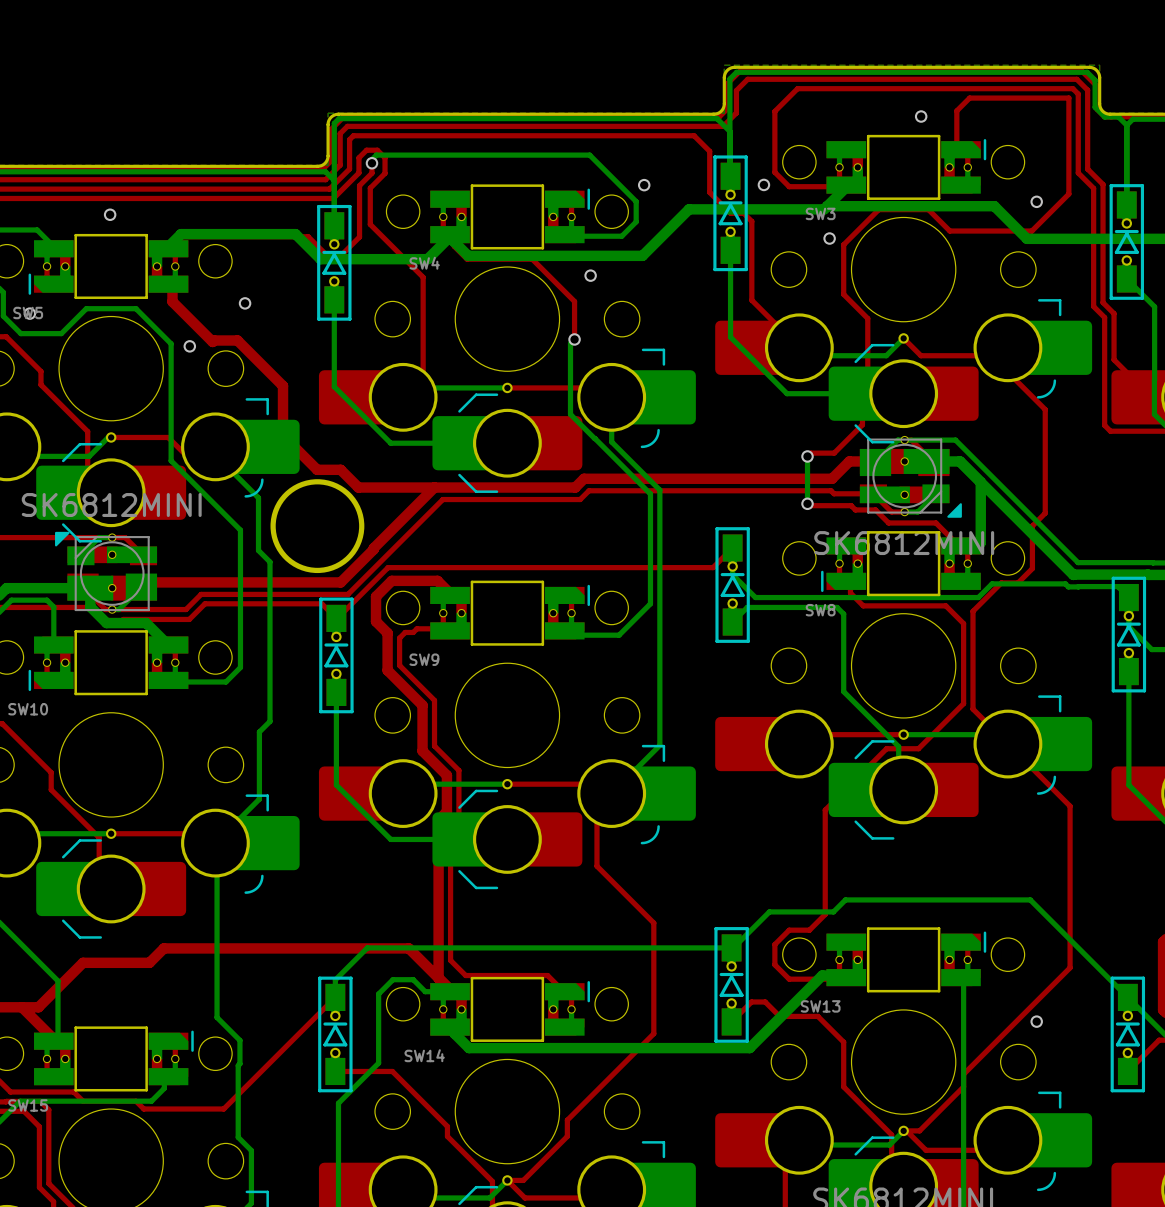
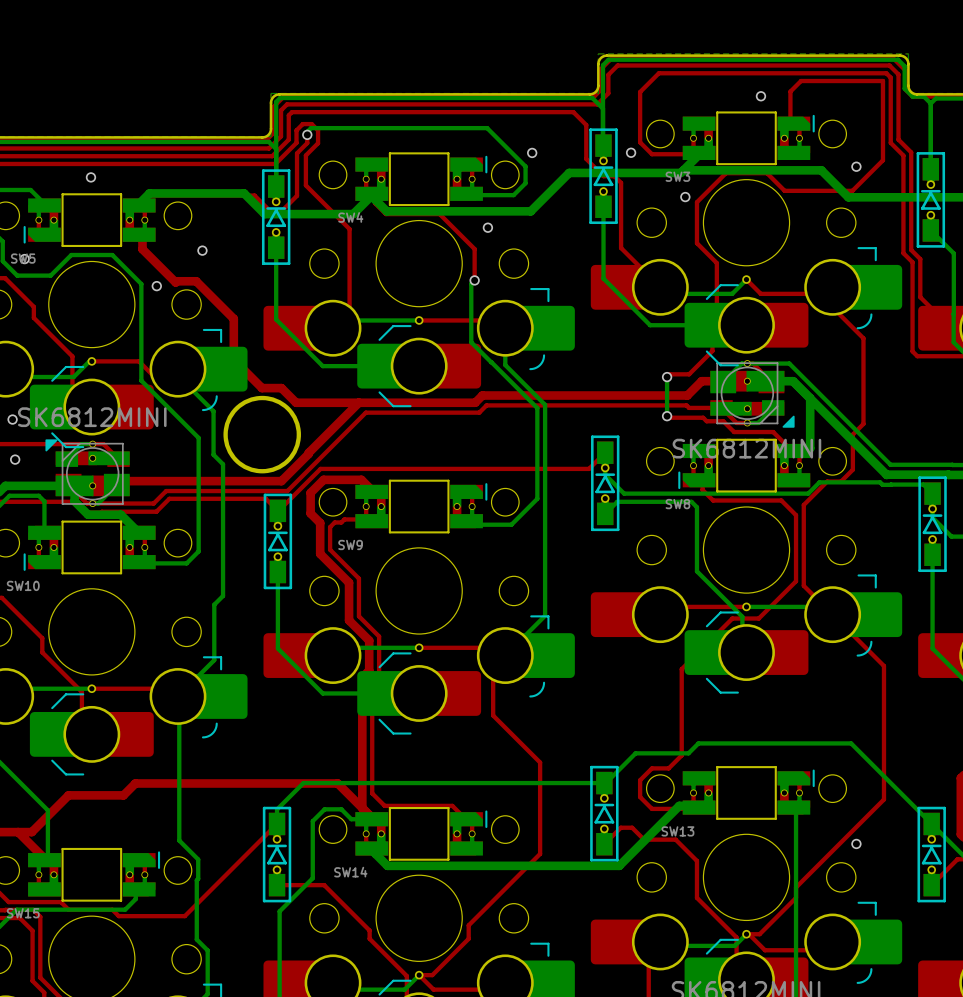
via: none -> (12, 419)
via: none -> (15, 459)

